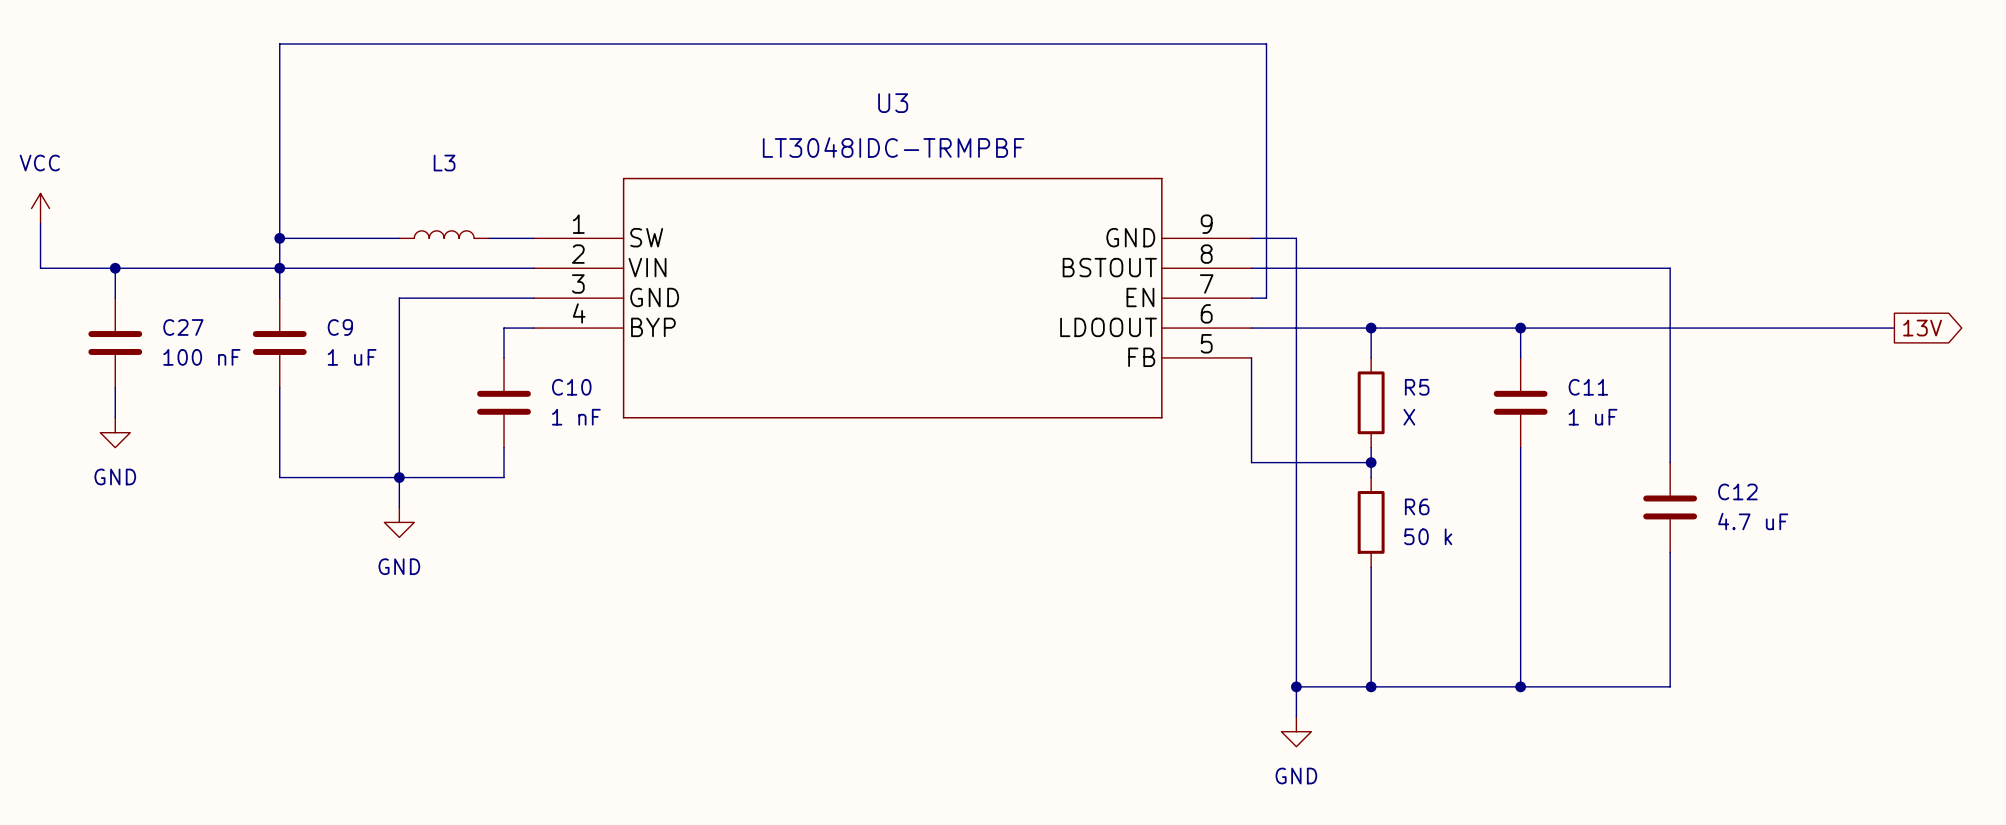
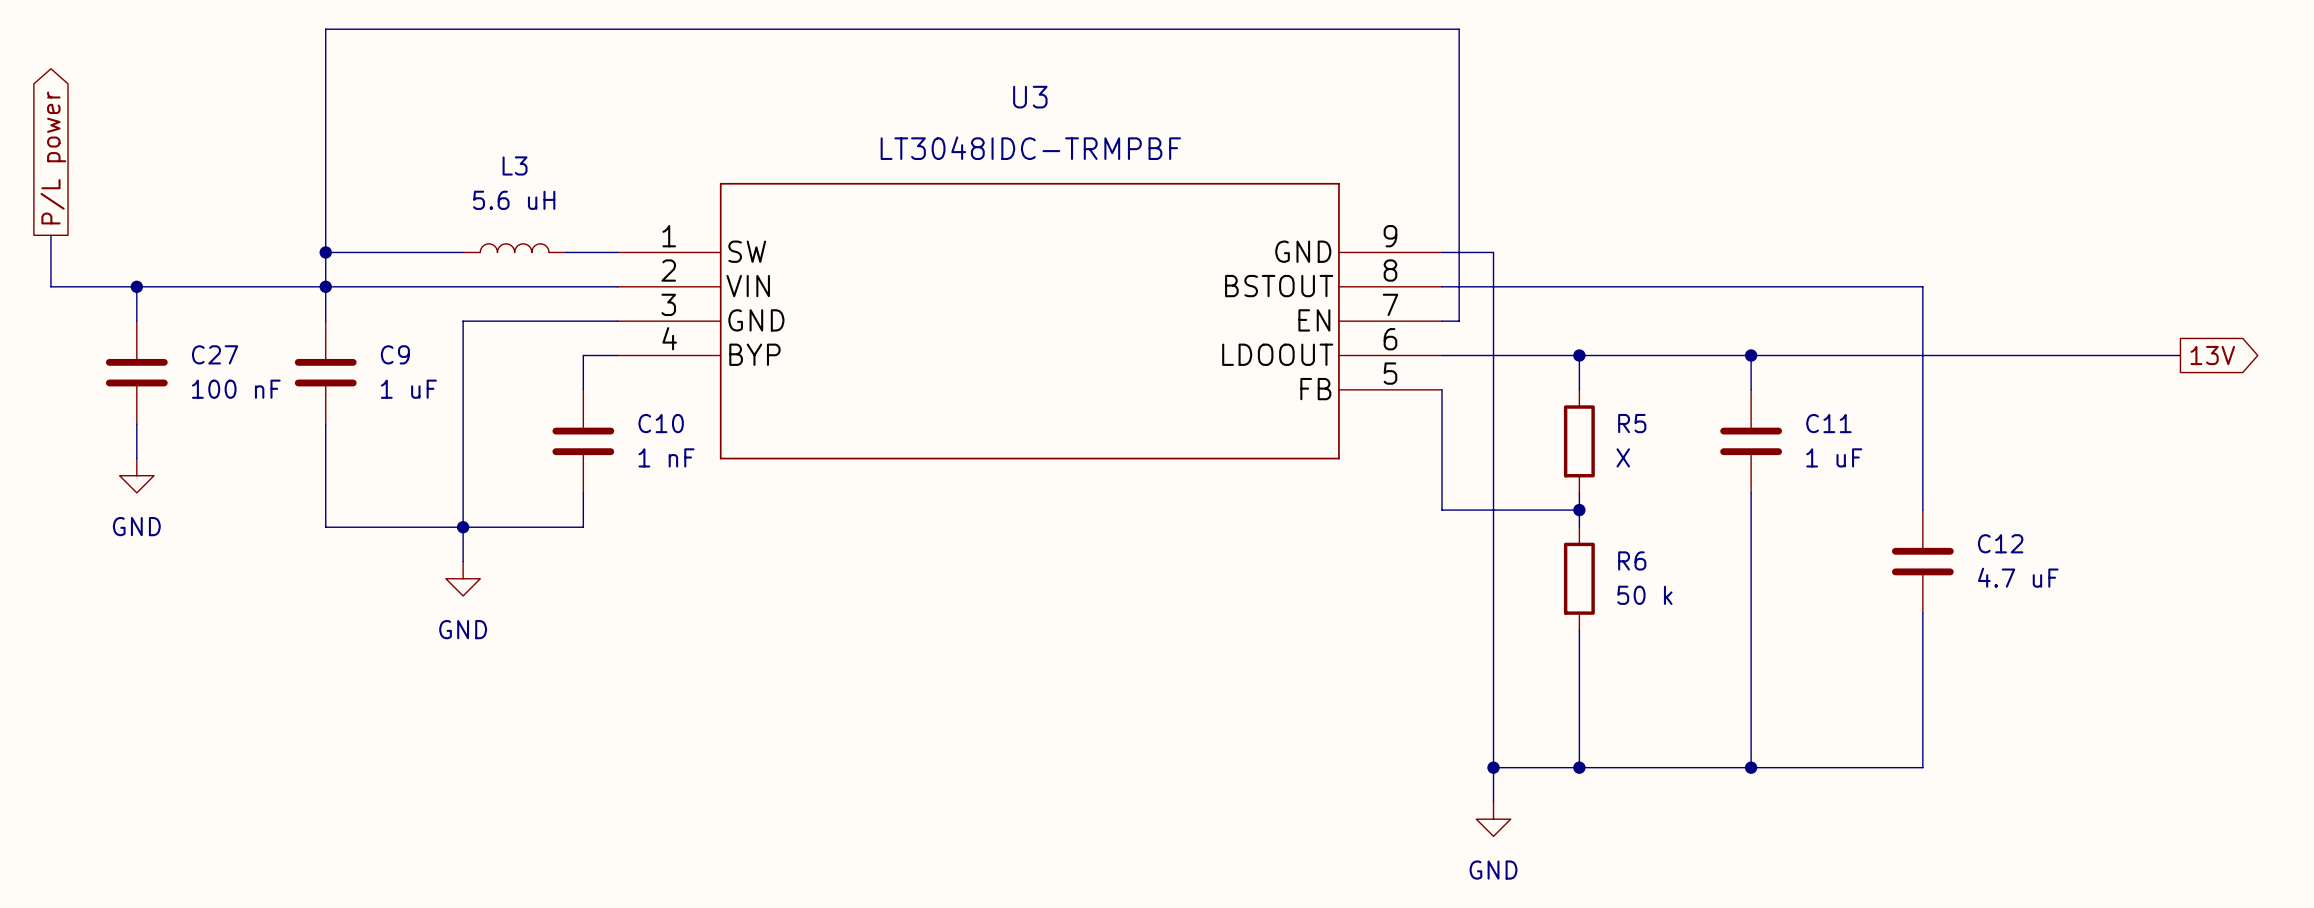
global label: none -> P/L power (53, 157)
L3 value: none -> 5.6 uH (514, 200)
power symbol: VCC (40, 208) -> none

